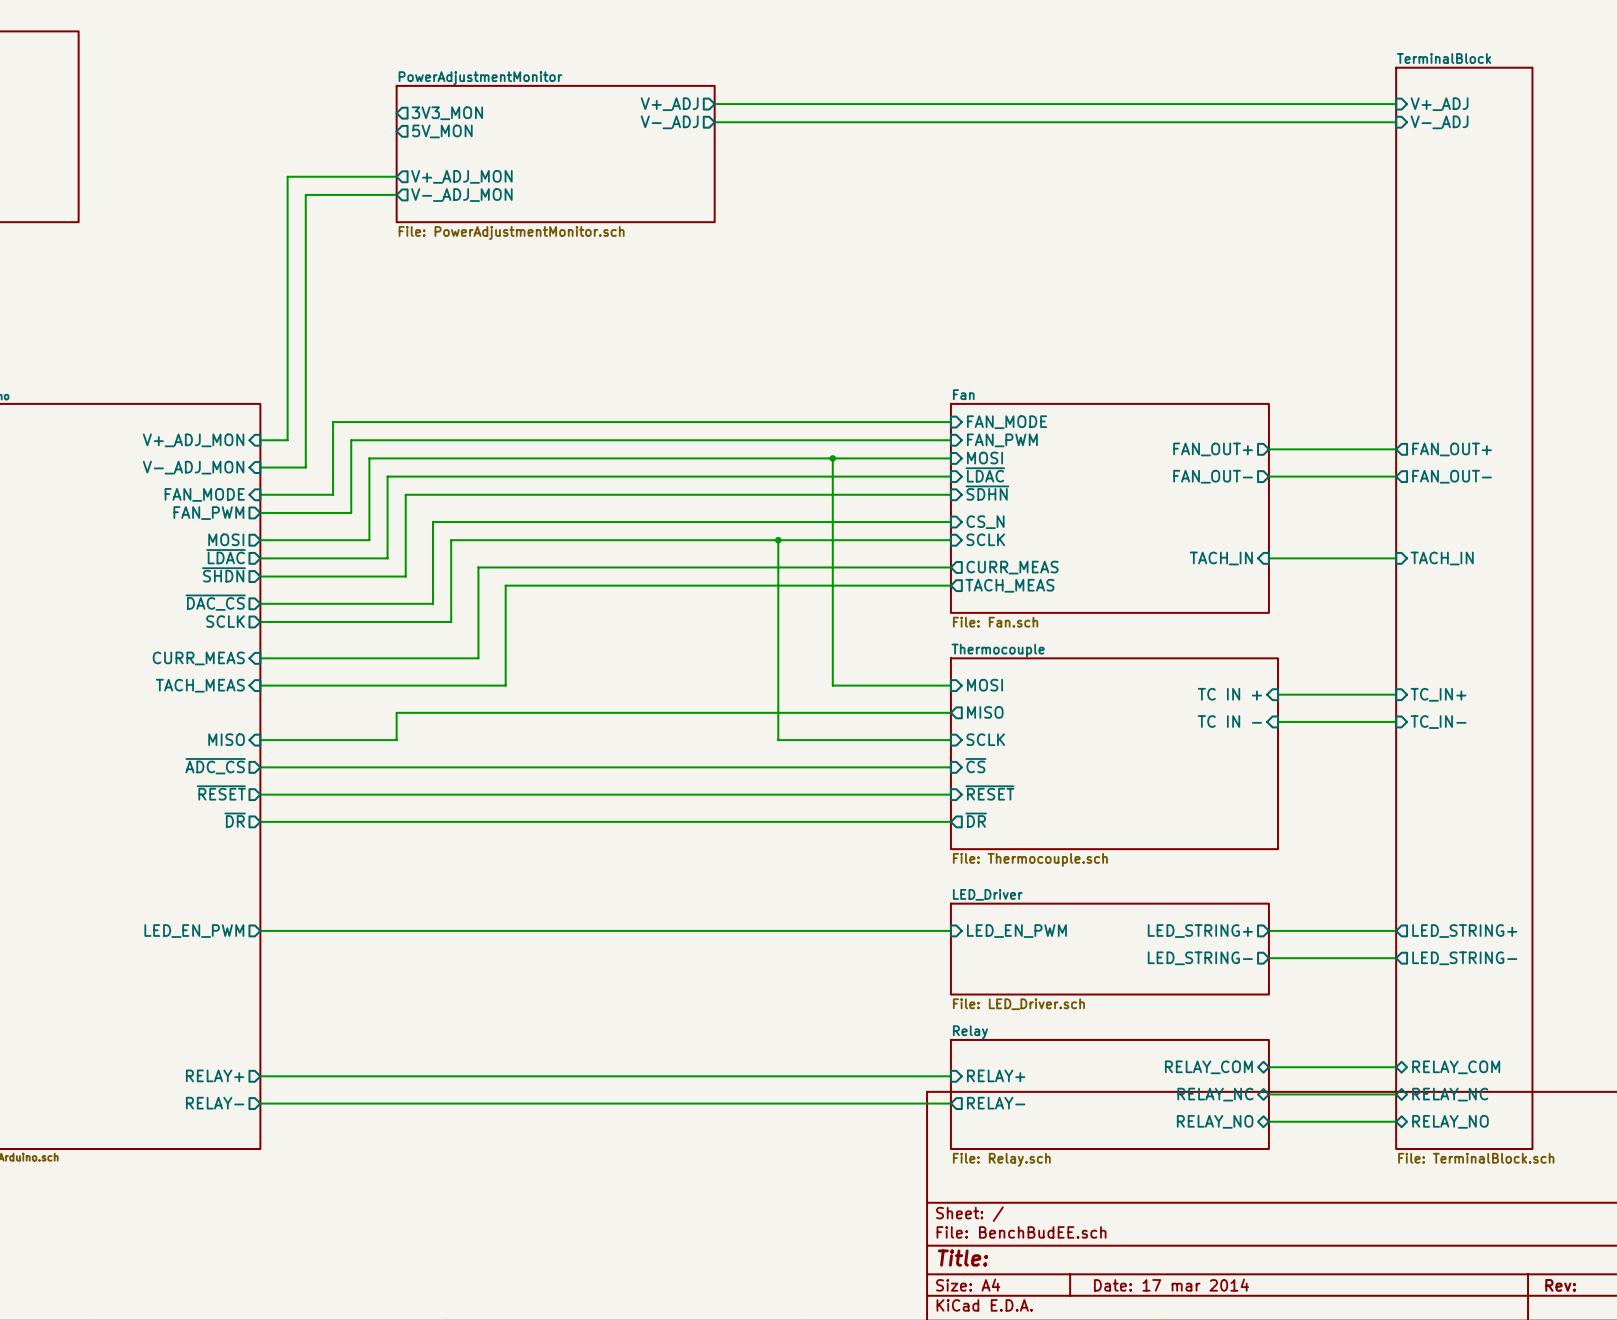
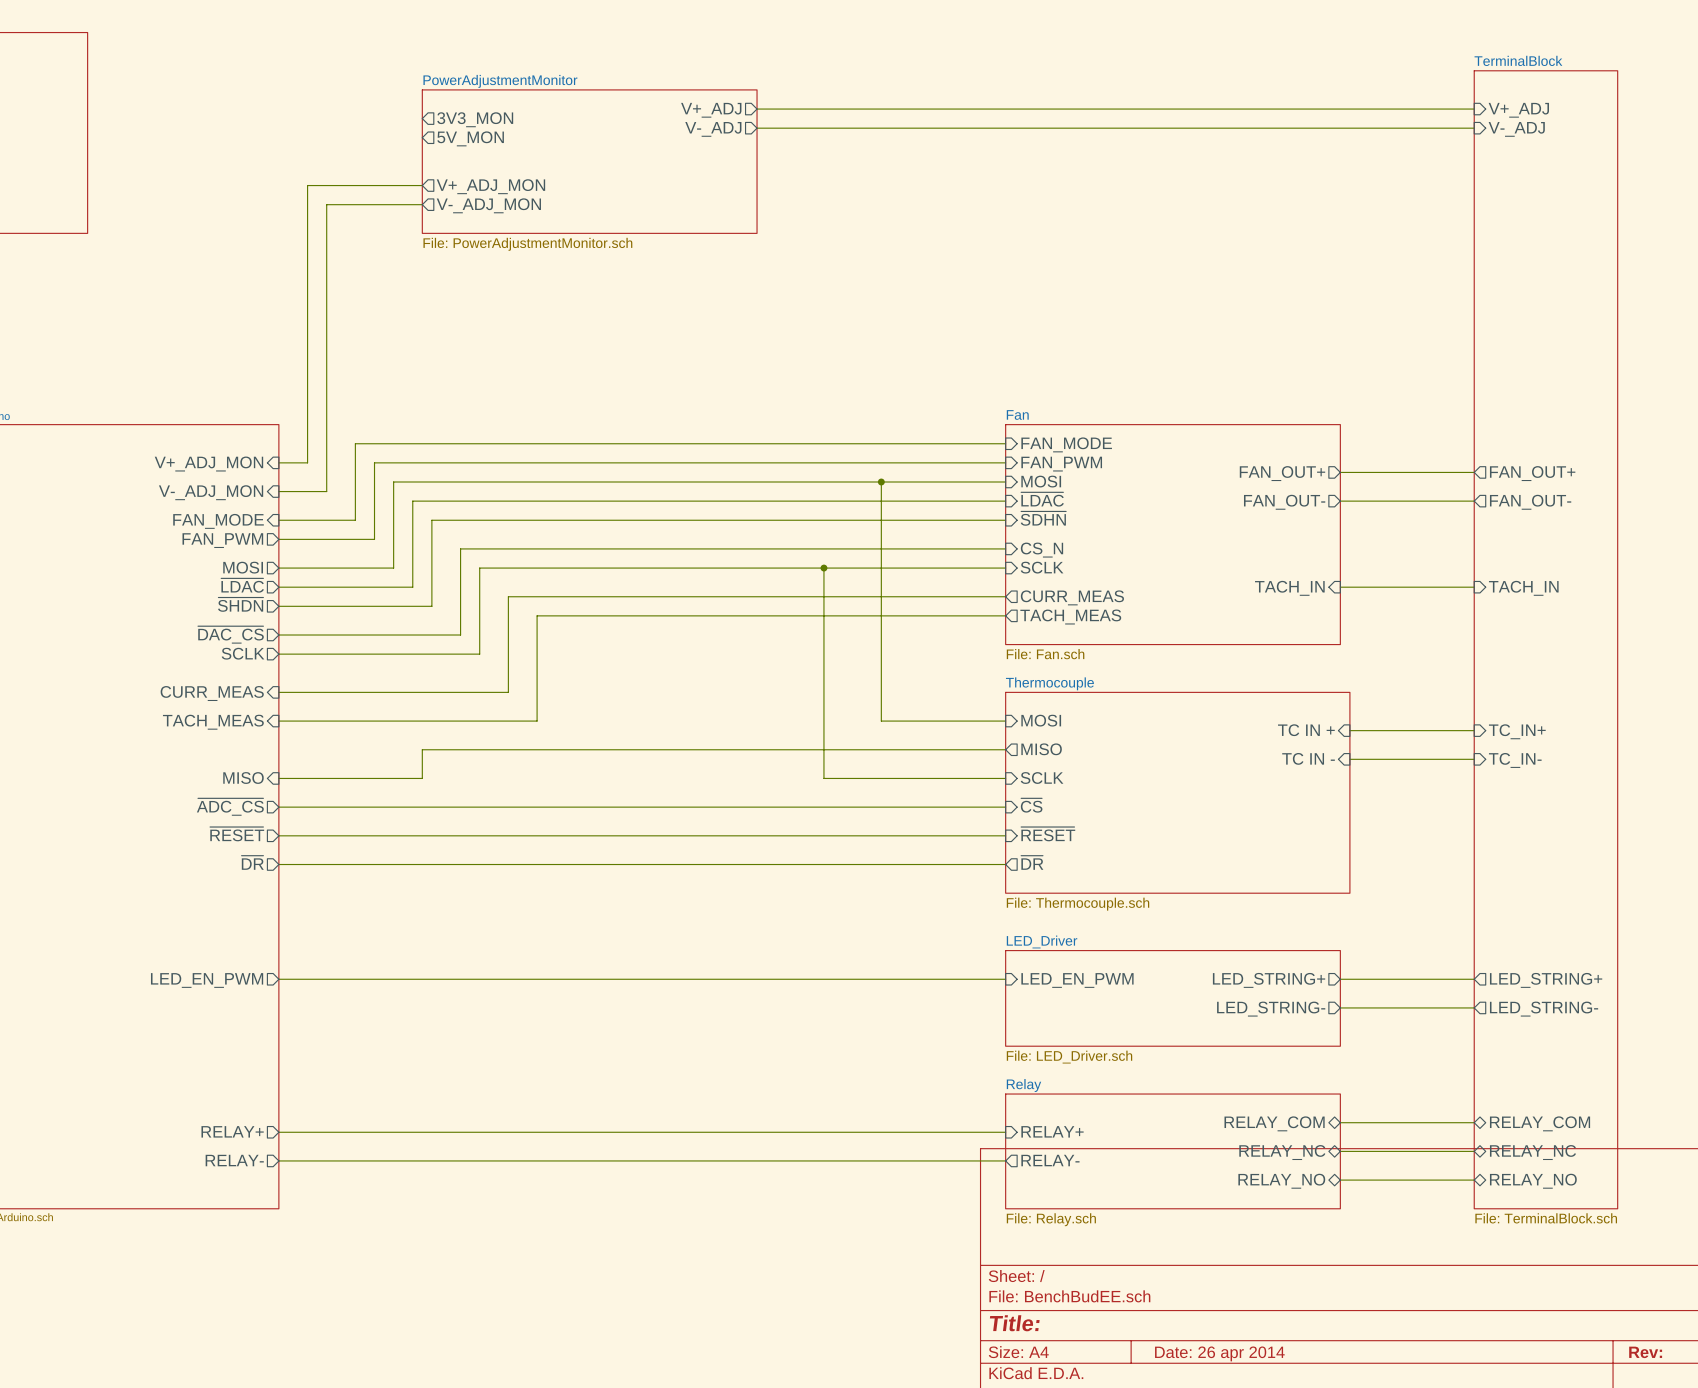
title block: Date: 17 mar 2014 (1171, 1285) -> Date: 26 apr 2014 (1219, 1353)

